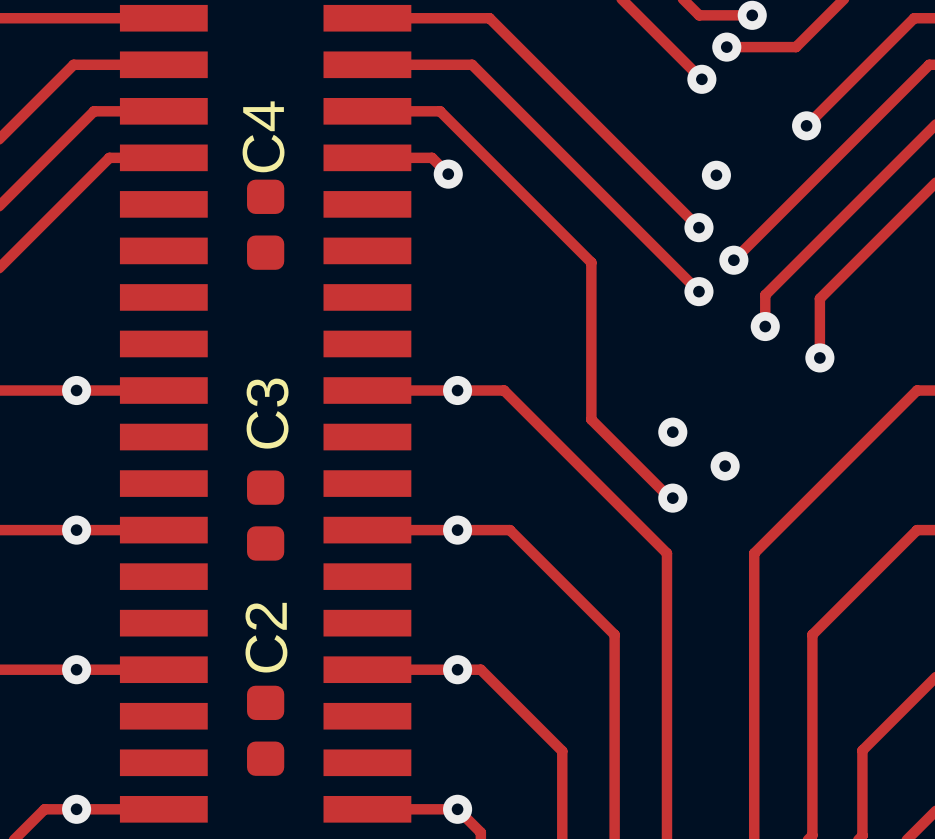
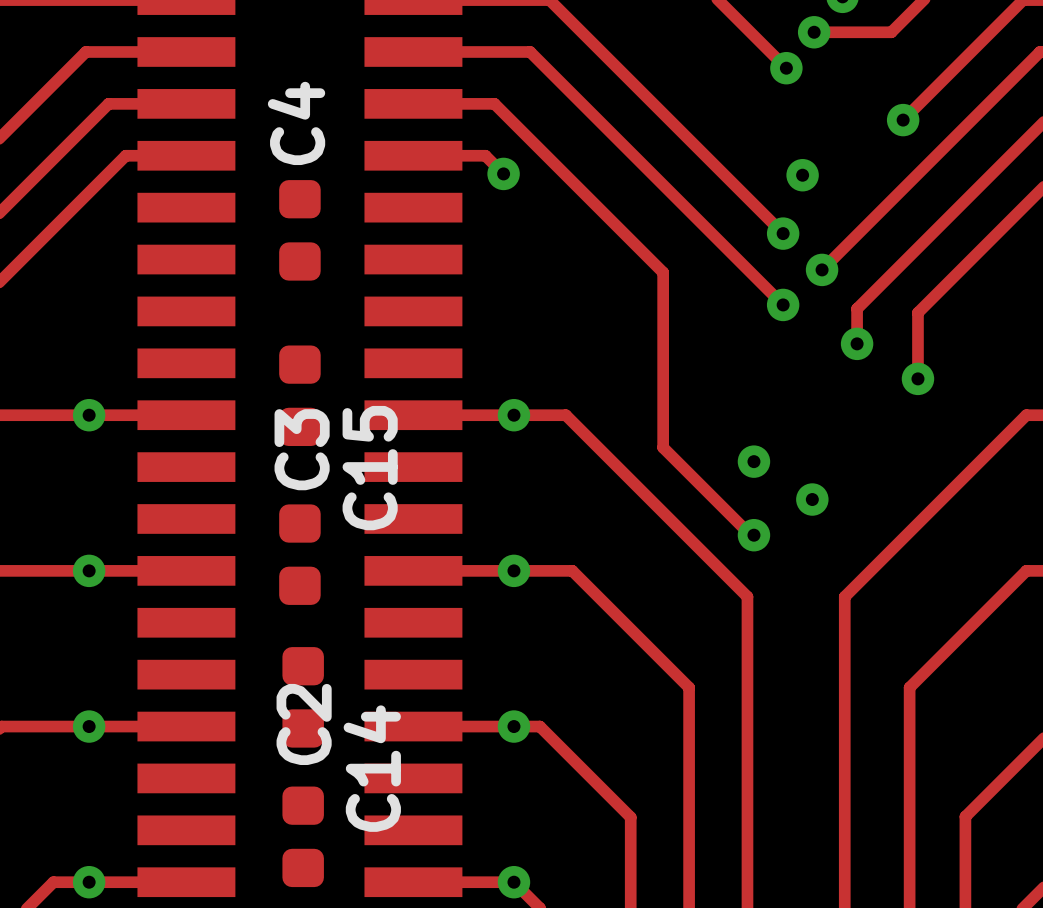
C15: none -> (299, 395)
C14: none -> (303, 697)
C2 position: (265, 730) -> (303, 836)

